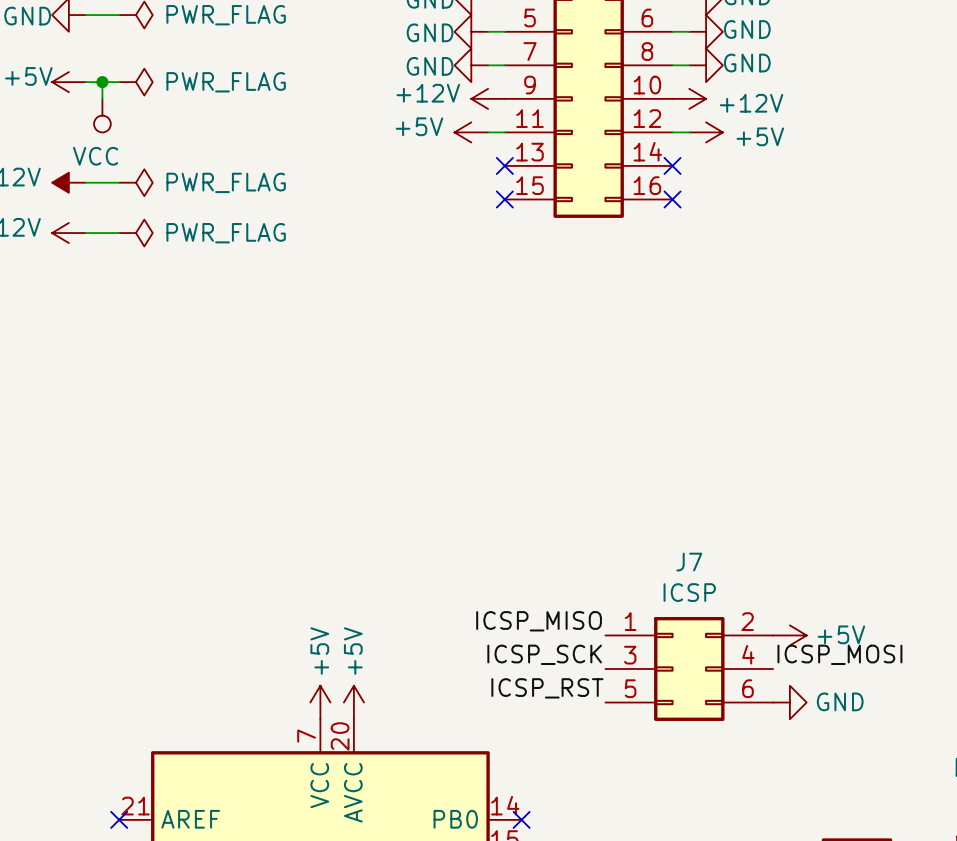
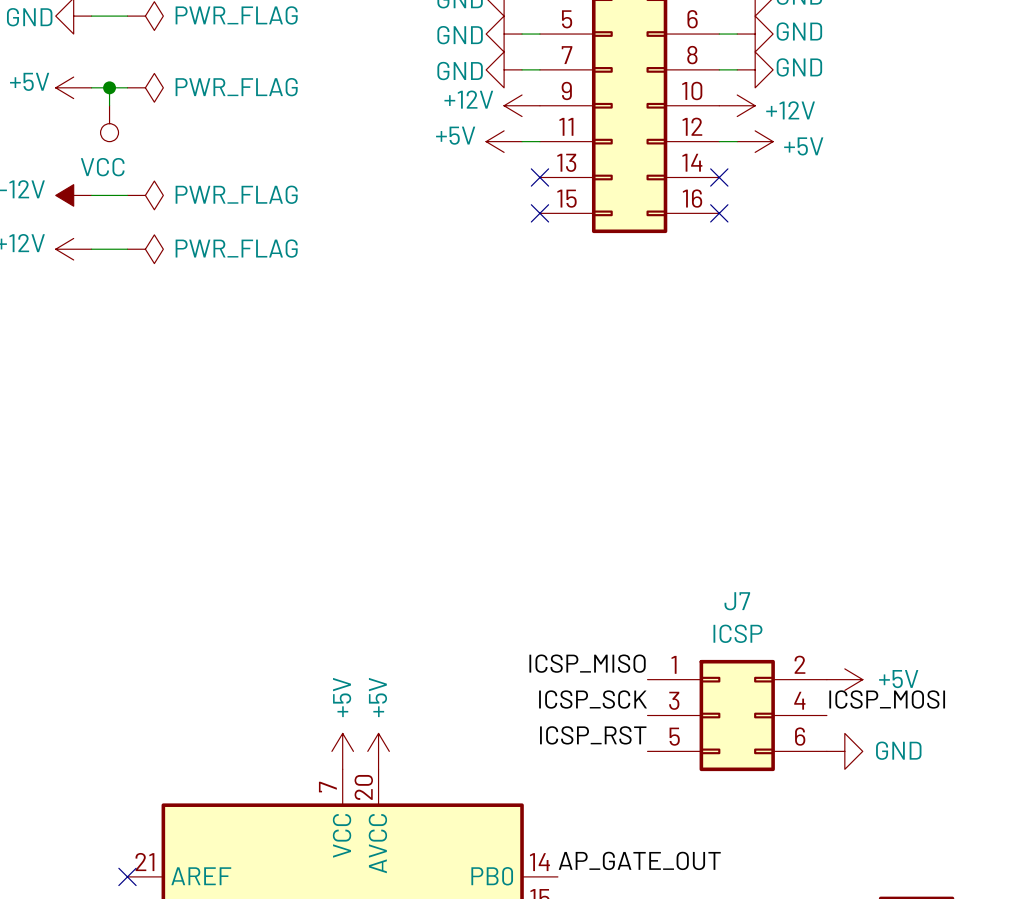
label: none -> AP_GATE_OUT (639, 860)
no-connect mark: (521, 819) -> none

